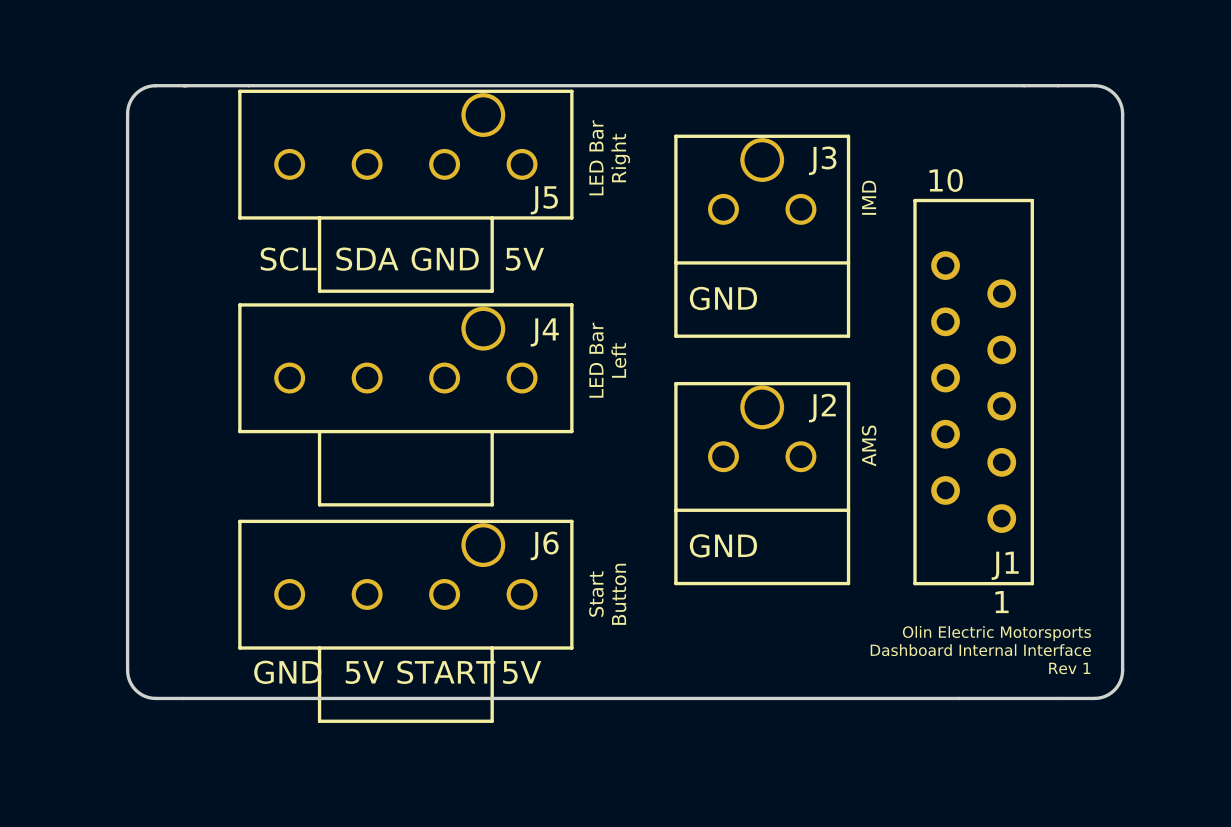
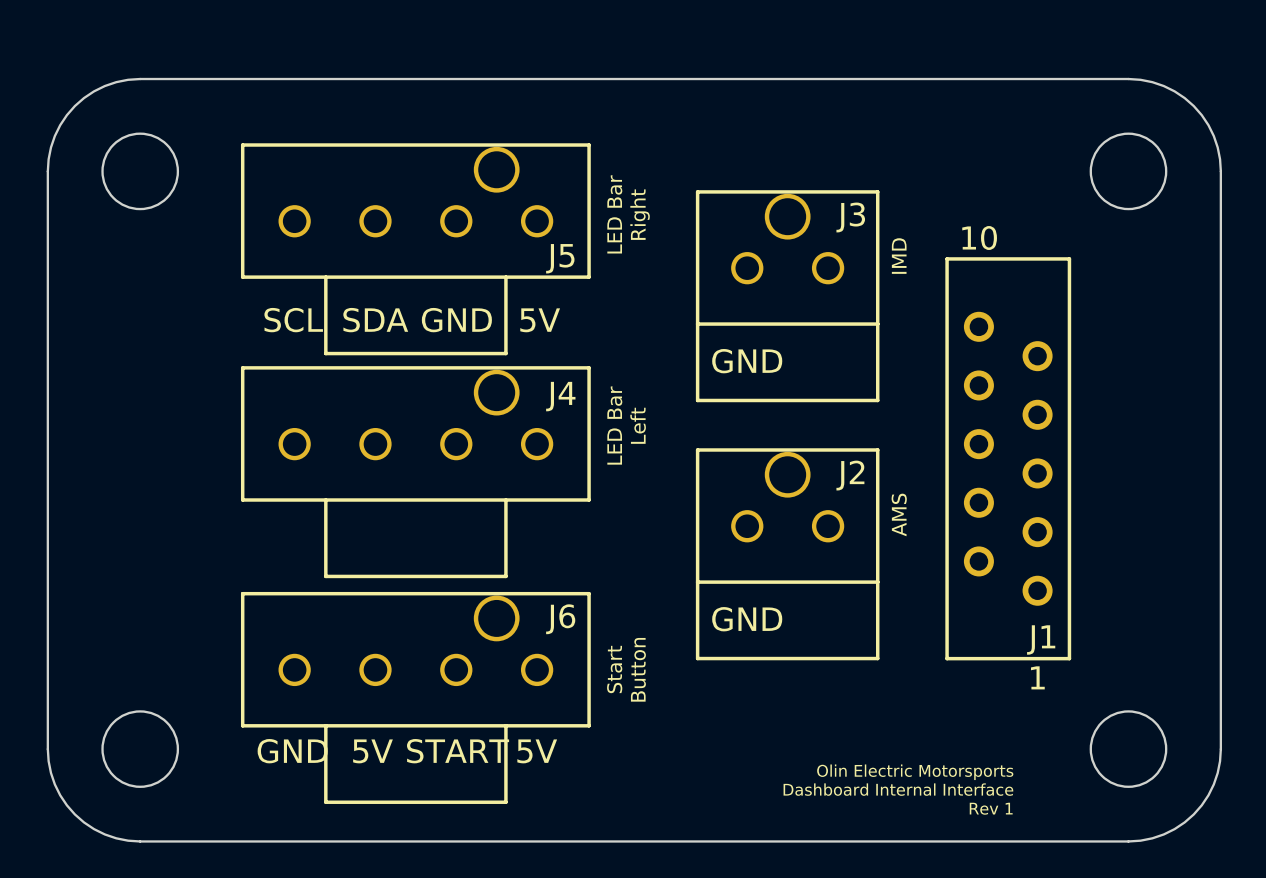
round board edge: none -> [101, 132, 180, 211]
round board edge: none -> [1089, 132, 1168, 211]
board edge: (155, 85) (1094, 85) (1108, 89) (1118, 99) (1122, 113) (1122, 670) (1118, 684) (1108, 694) (1094, 698) (155, 698) (141, 694) (131, 684) (127, 670) (127, 113) (129, 103) (135, 93) (144, 87) (155, 85) -> (140, 79) (128, 79) (104, 86) (94, 91) (74, 106) (60, 125) (50, 147) (48, 159) (47, 749) (50, 773) (60, 795) (74, 814) (83, 822) (94, 829) (116, 838) (140, 841) (1128, 841) (1152, 838) (1174, 829) (1193, 814) (1201, 805) (1208, 795) (1217, 773) (1220, 749) (1220, 171) (1217, 147) (1208, 125) (1193, 106) (1184, 98) (1174, 91) (1152, 82) (1128, 79) (140, 79)
round board edge: none -> [101, 710, 180, 788]
text position: Olin Electric Motorsports (996, 633) -> Olin Electric Motorsports (915, 772)
round board edge: none -> [1089, 710, 1168, 788]
text position: Dashboard Internal Interface (980, 650) -> Dashboard Internal Interface (898, 789)
text position: Rev 1 (1069, 668) -> Rev 1 (991, 808)

